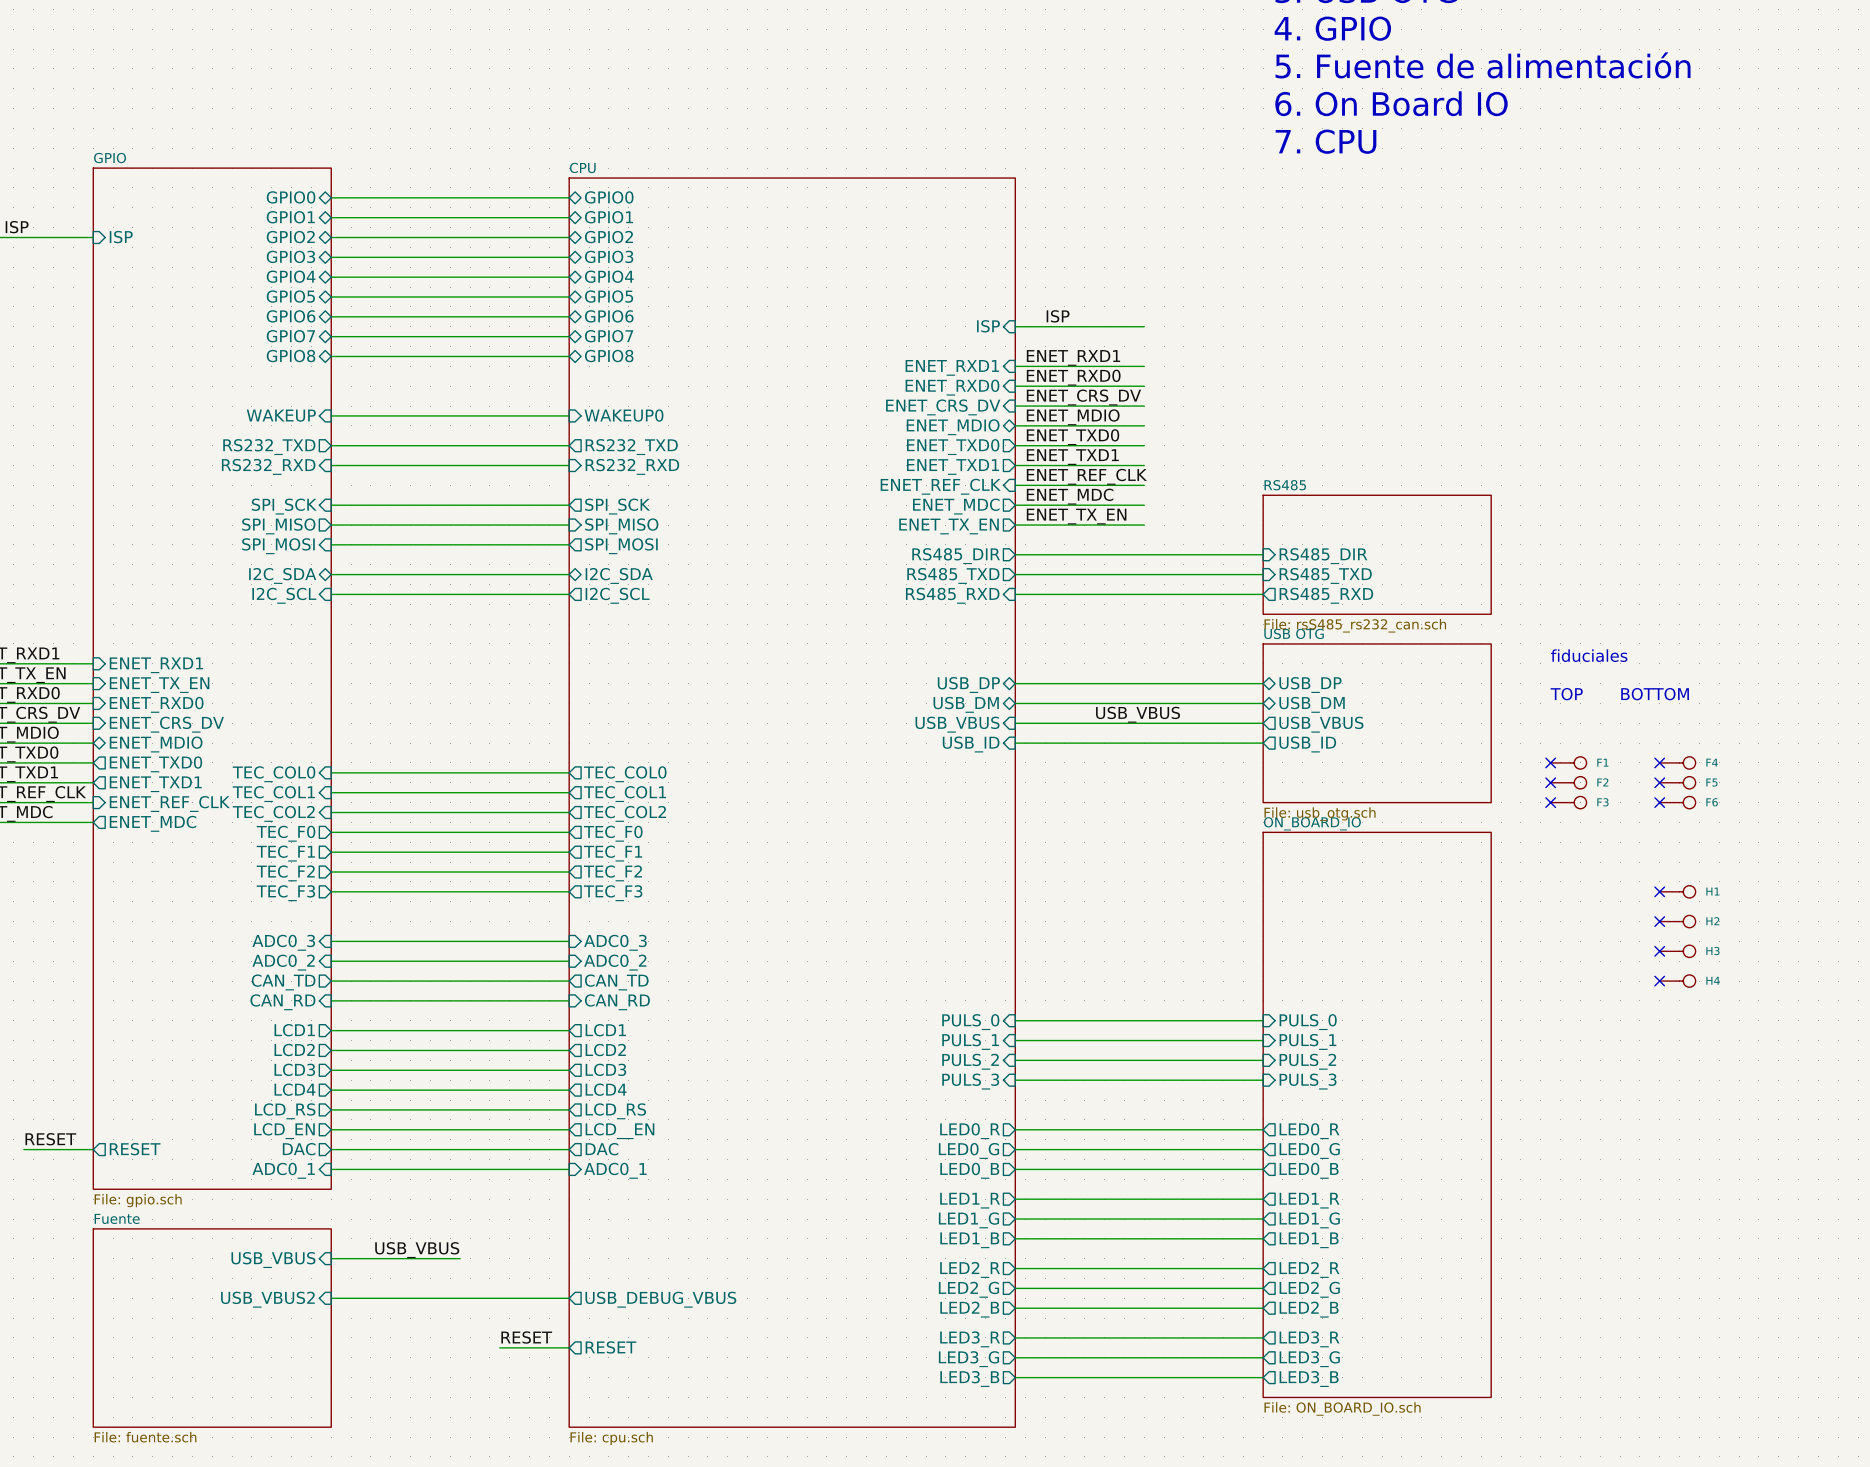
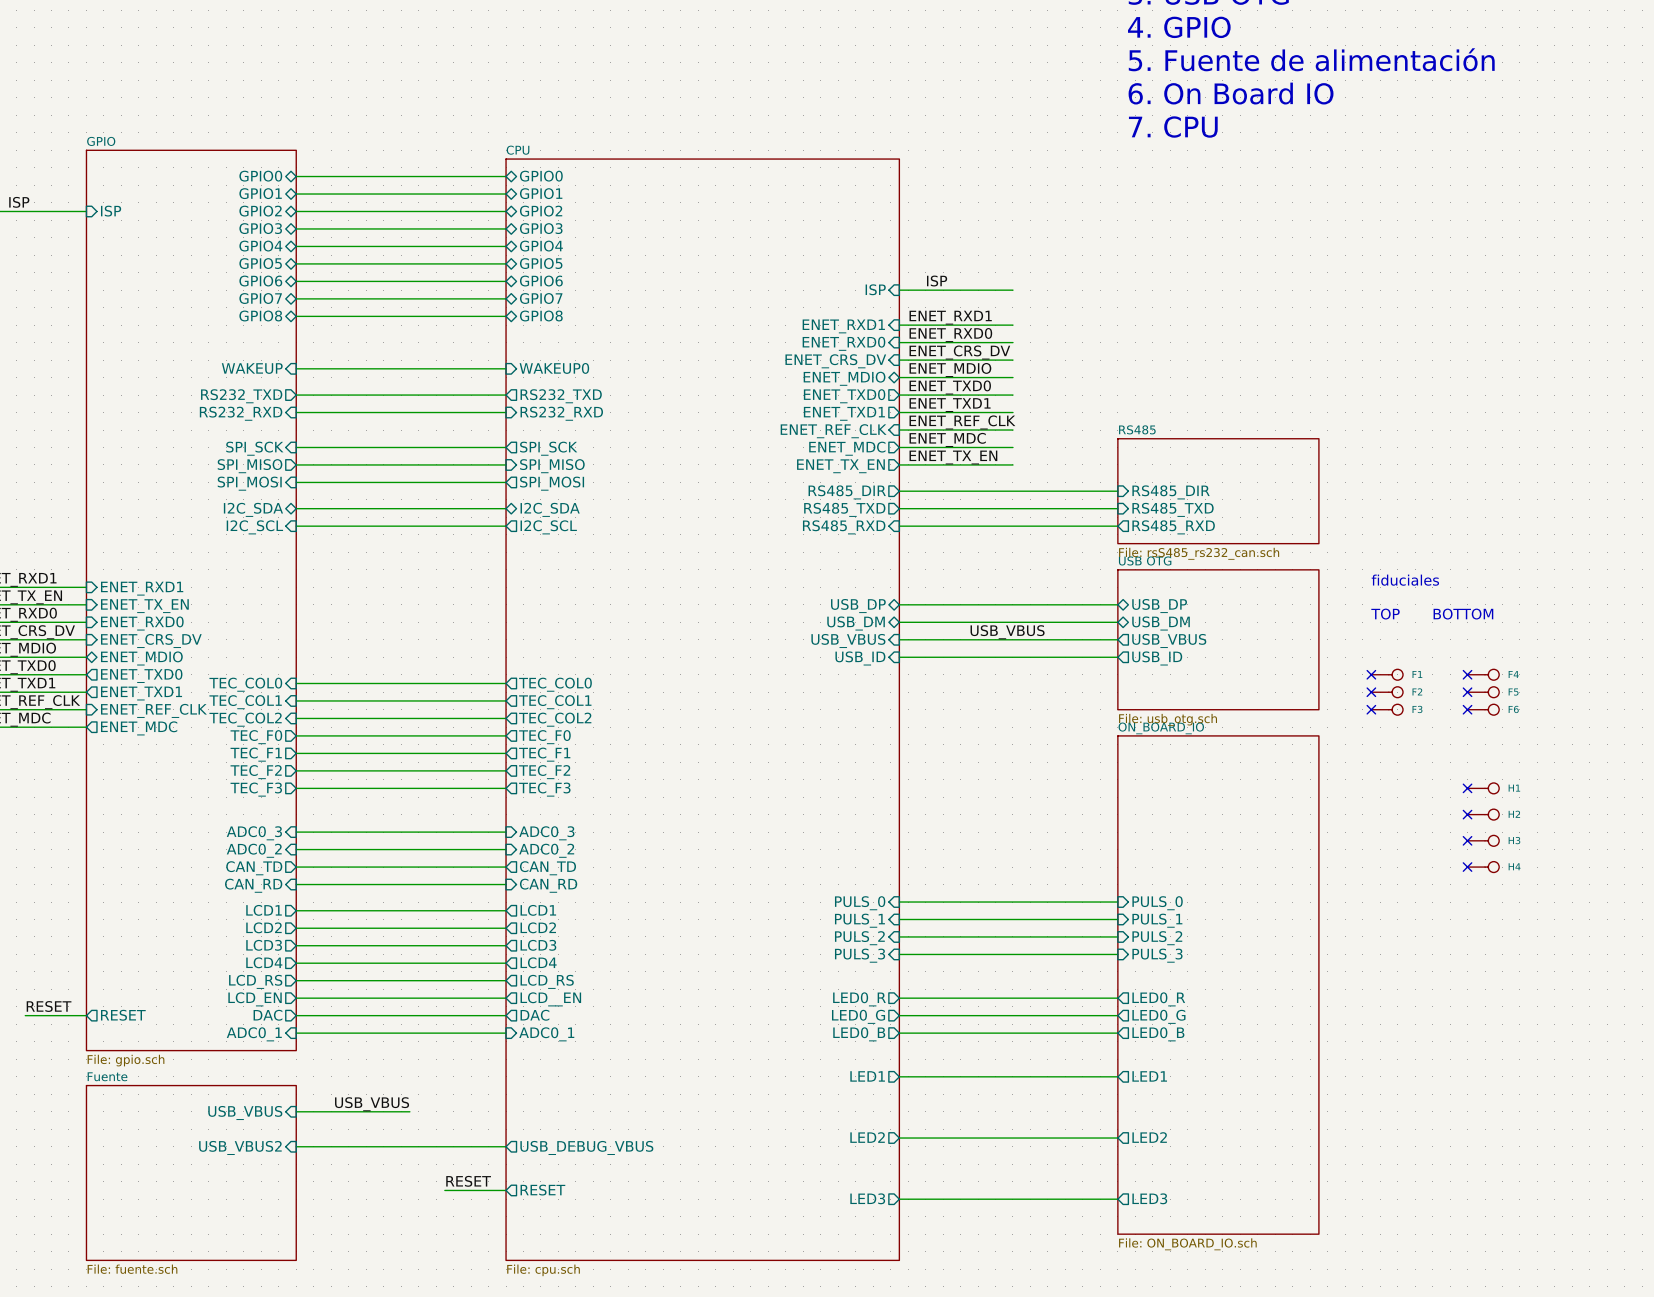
wire: (1015, 1199) (1263, 1199) -> none
sheet pin: LED1_R (970, 1200) -> none
sheet pin: LED1_R (1309, 1200) -> none
sheet pin: LED1_G (968, 1220) -> LED1 (867, 1076)
sheet pin: LED1_G (1309, 1220) -> LED1 (1149, 1076)
wire: (1015, 1238) (1263, 1238) -> none
sheet pin: LED1_B (969, 1240) -> none
sheet pin: LED1_B (1309, 1240) -> none
wire: (1015, 1268) (1263, 1268) -> none
sheet pin: LED2_R (970, 1269) -> none
sheet pin: LED2_R (1309, 1269) -> none
sheet pin: LED2_G (968, 1289) -> LED2 (867, 1137)
sheet pin: LED2_G (1309, 1289) -> LED2 (1149, 1137)
wire: (1015, 1308) (1263, 1308) -> none
sheet pin: LED2_B (969, 1309) -> none
sheet pin: LED2_B (1309, 1309) -> none
wire: (1015, 1337) (1263, 1337) -> none
sheet pin: LED3_R (970, 1339) -> none
sheet pin: LED3_R (1309, 1339) -> none
sheet pin: LED3_G (968, 1359) -> LED3 (867, 1198)
sheet pin: LED3_G (1309, 1359) -> LED3 (1149, 1198)
wire: (1015, 1377) (1263, 1377) -> none
sheet pin: LED3_B (969, 1378) -> none
sheet pin: LED3_B (1309, 1378) -> none

